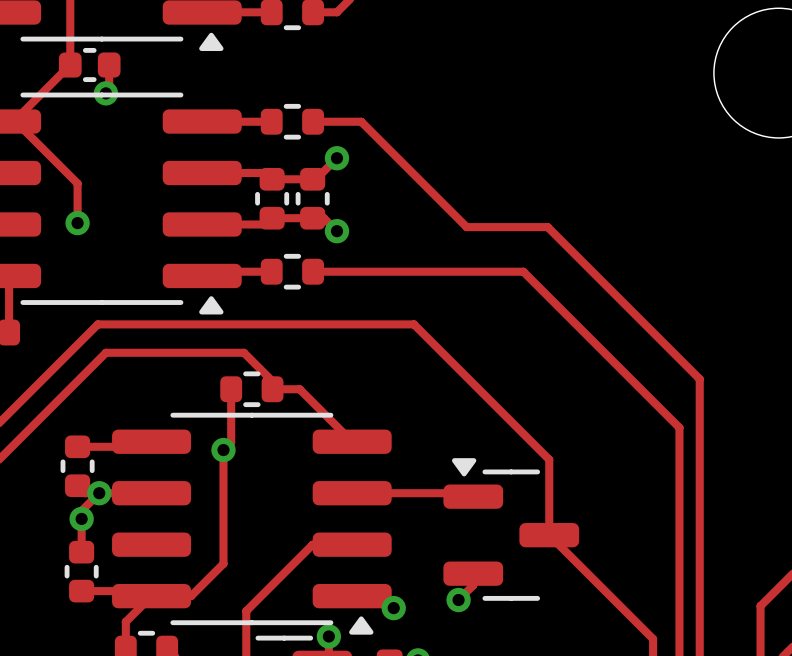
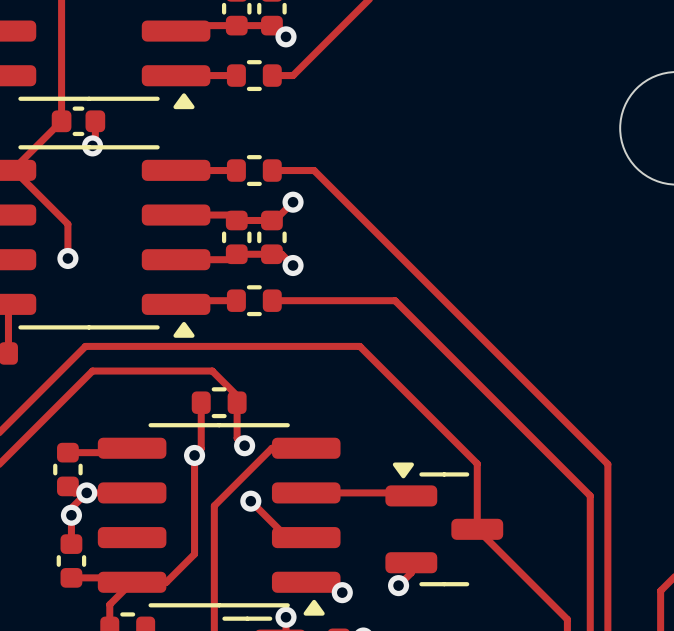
track: (466, 227) (547, 227) (699, 379) (699, 460) -> (405, 261) (607, 464)
track: (454, 271) (523, 271) (679, 427) (679, 496) -> (395, 300) (590, 495)
track: (272, 389) (299, 389) (352, 441) -> (237, 402) (237, 438) (244, 445)
via: none -> (244, 445)
track: none -> (250, 501) (287, 537)
via: none -> (250, 501)
track: (330, 544) (312, 544) (246, 611) -> (306, 448) (271, 448) (214, 505) (214, 595)

